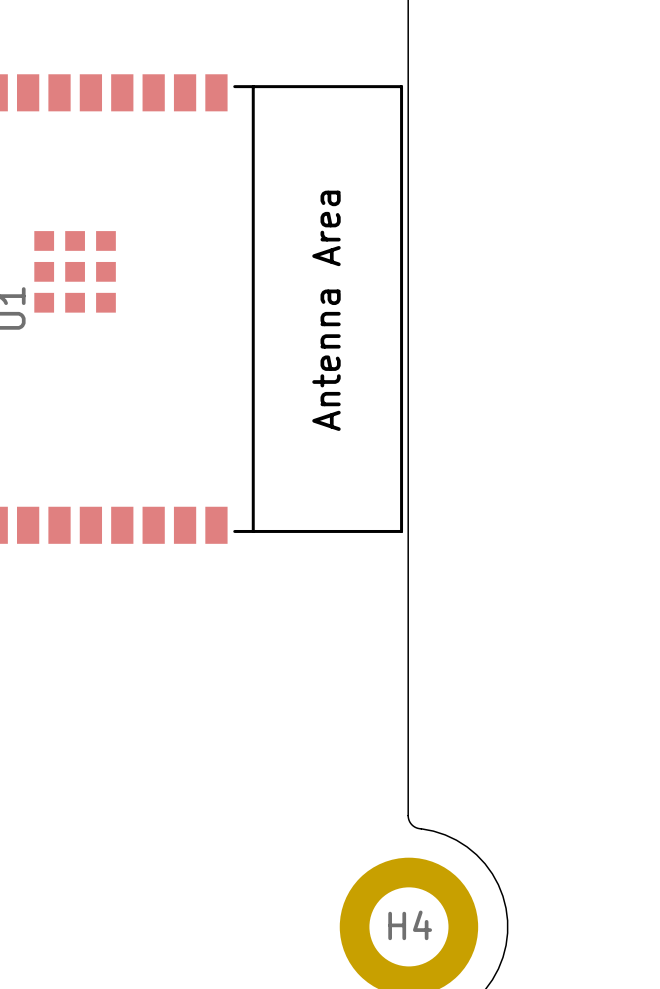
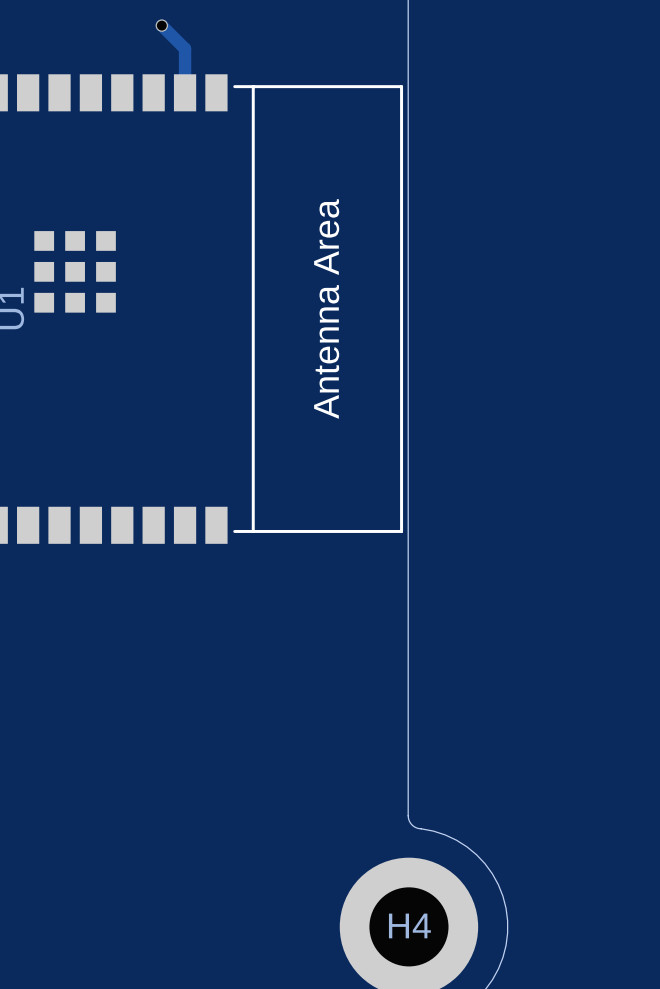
track: none -> (161, 25) (185, 48) (185, 92)
via: none -> (161, 25)

